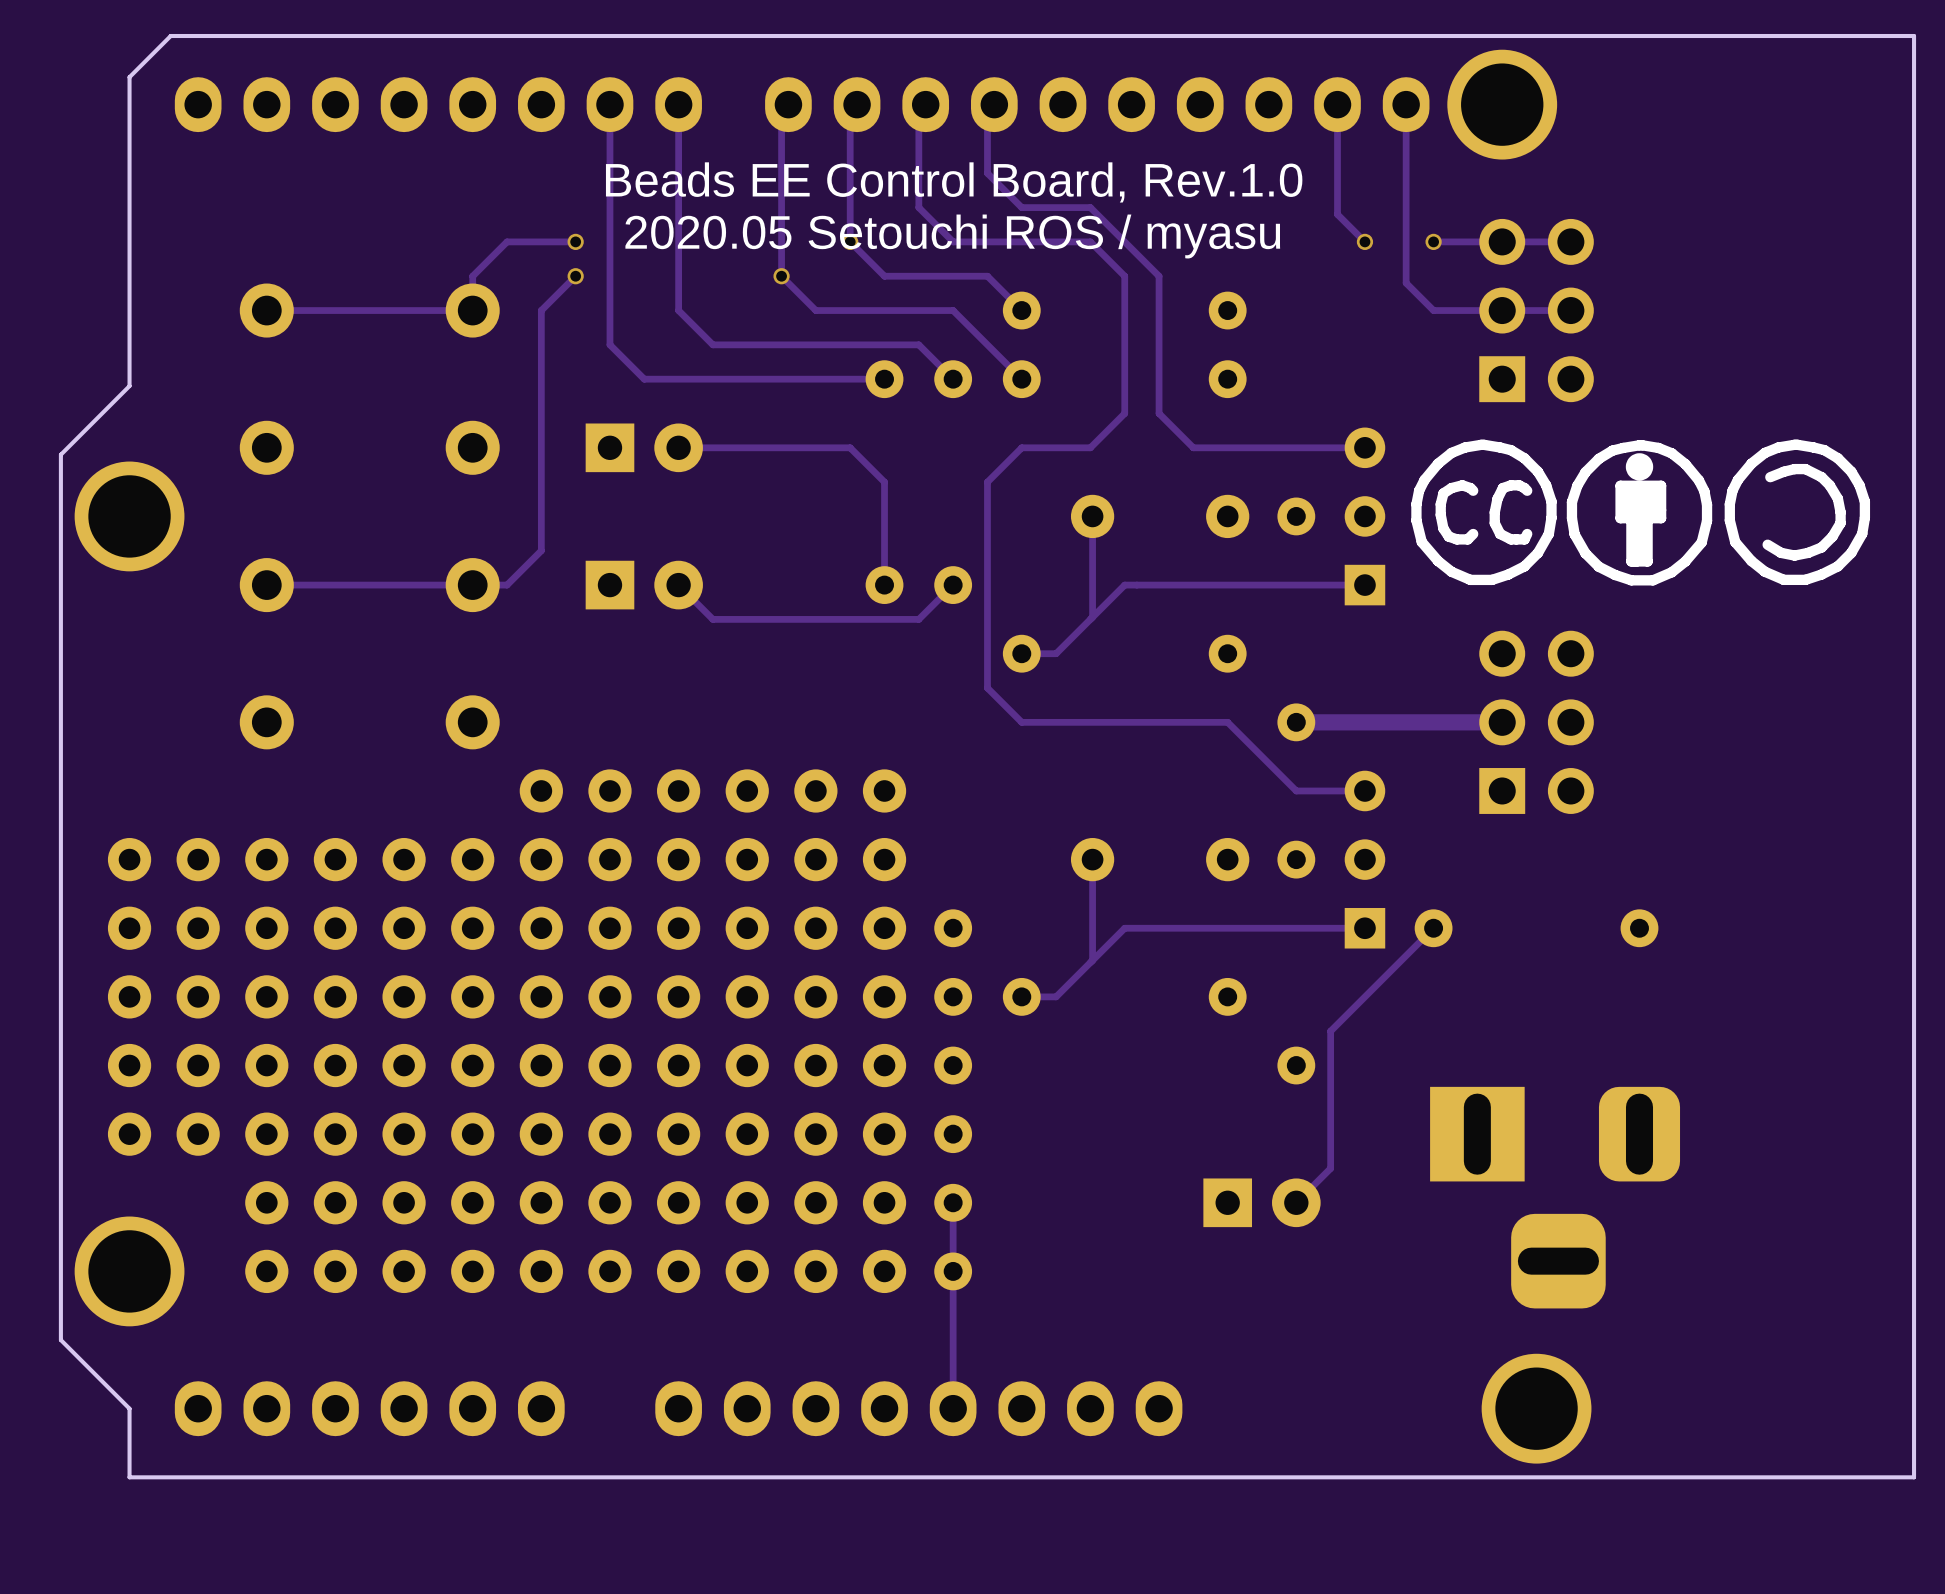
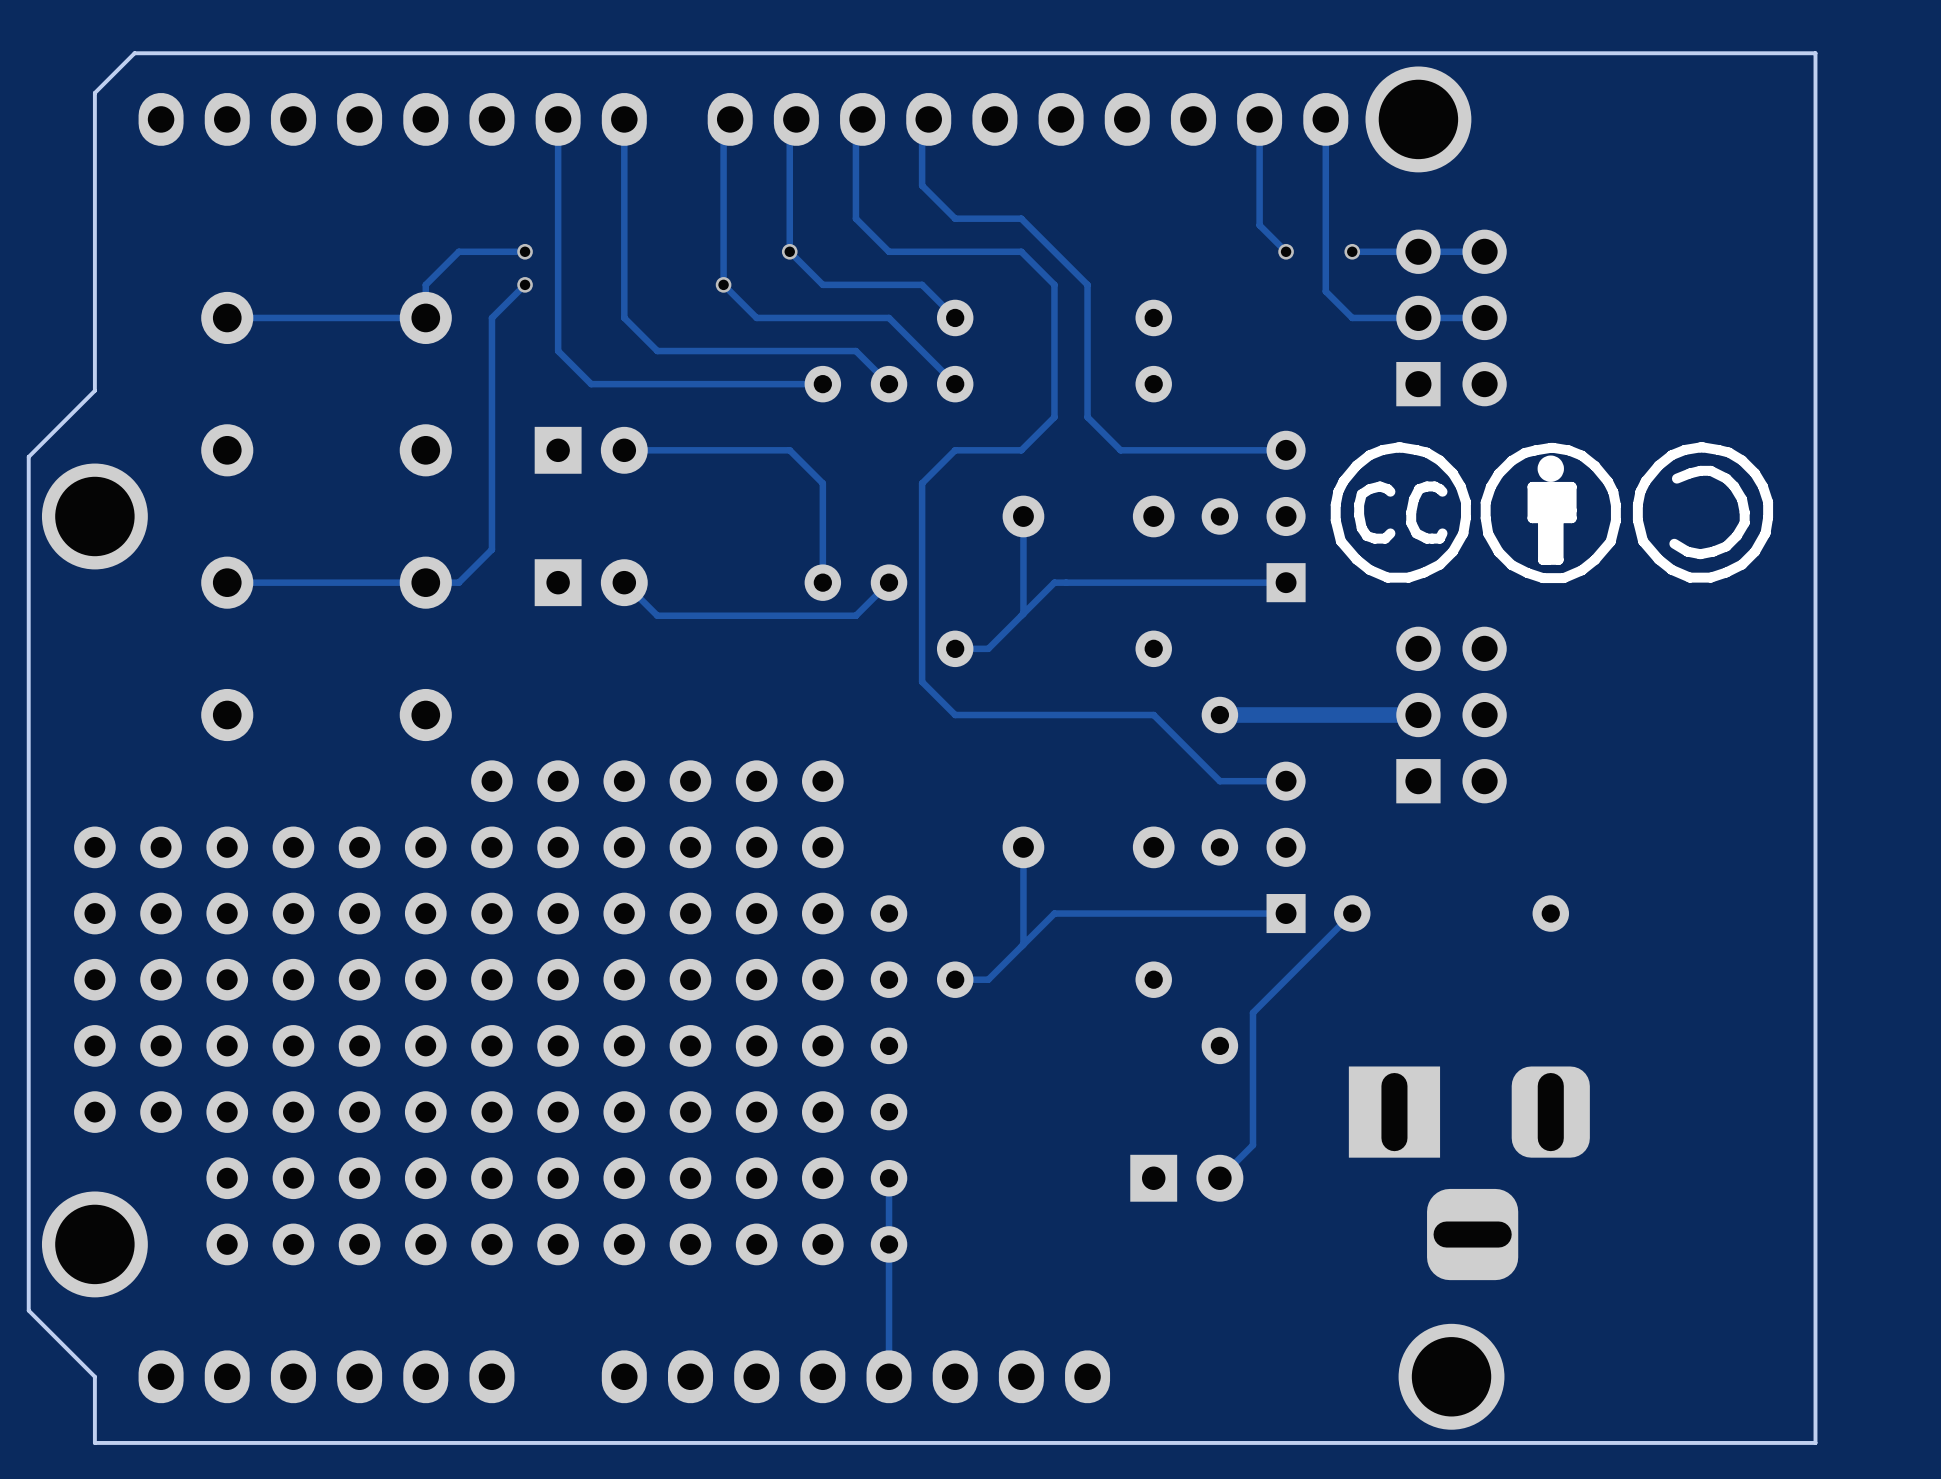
text: Beads EE Control Board, Rev.1.0 (954, 182) -> none
text: 2020.05 Setouchi ROS / myasu (952, 236) -> none

